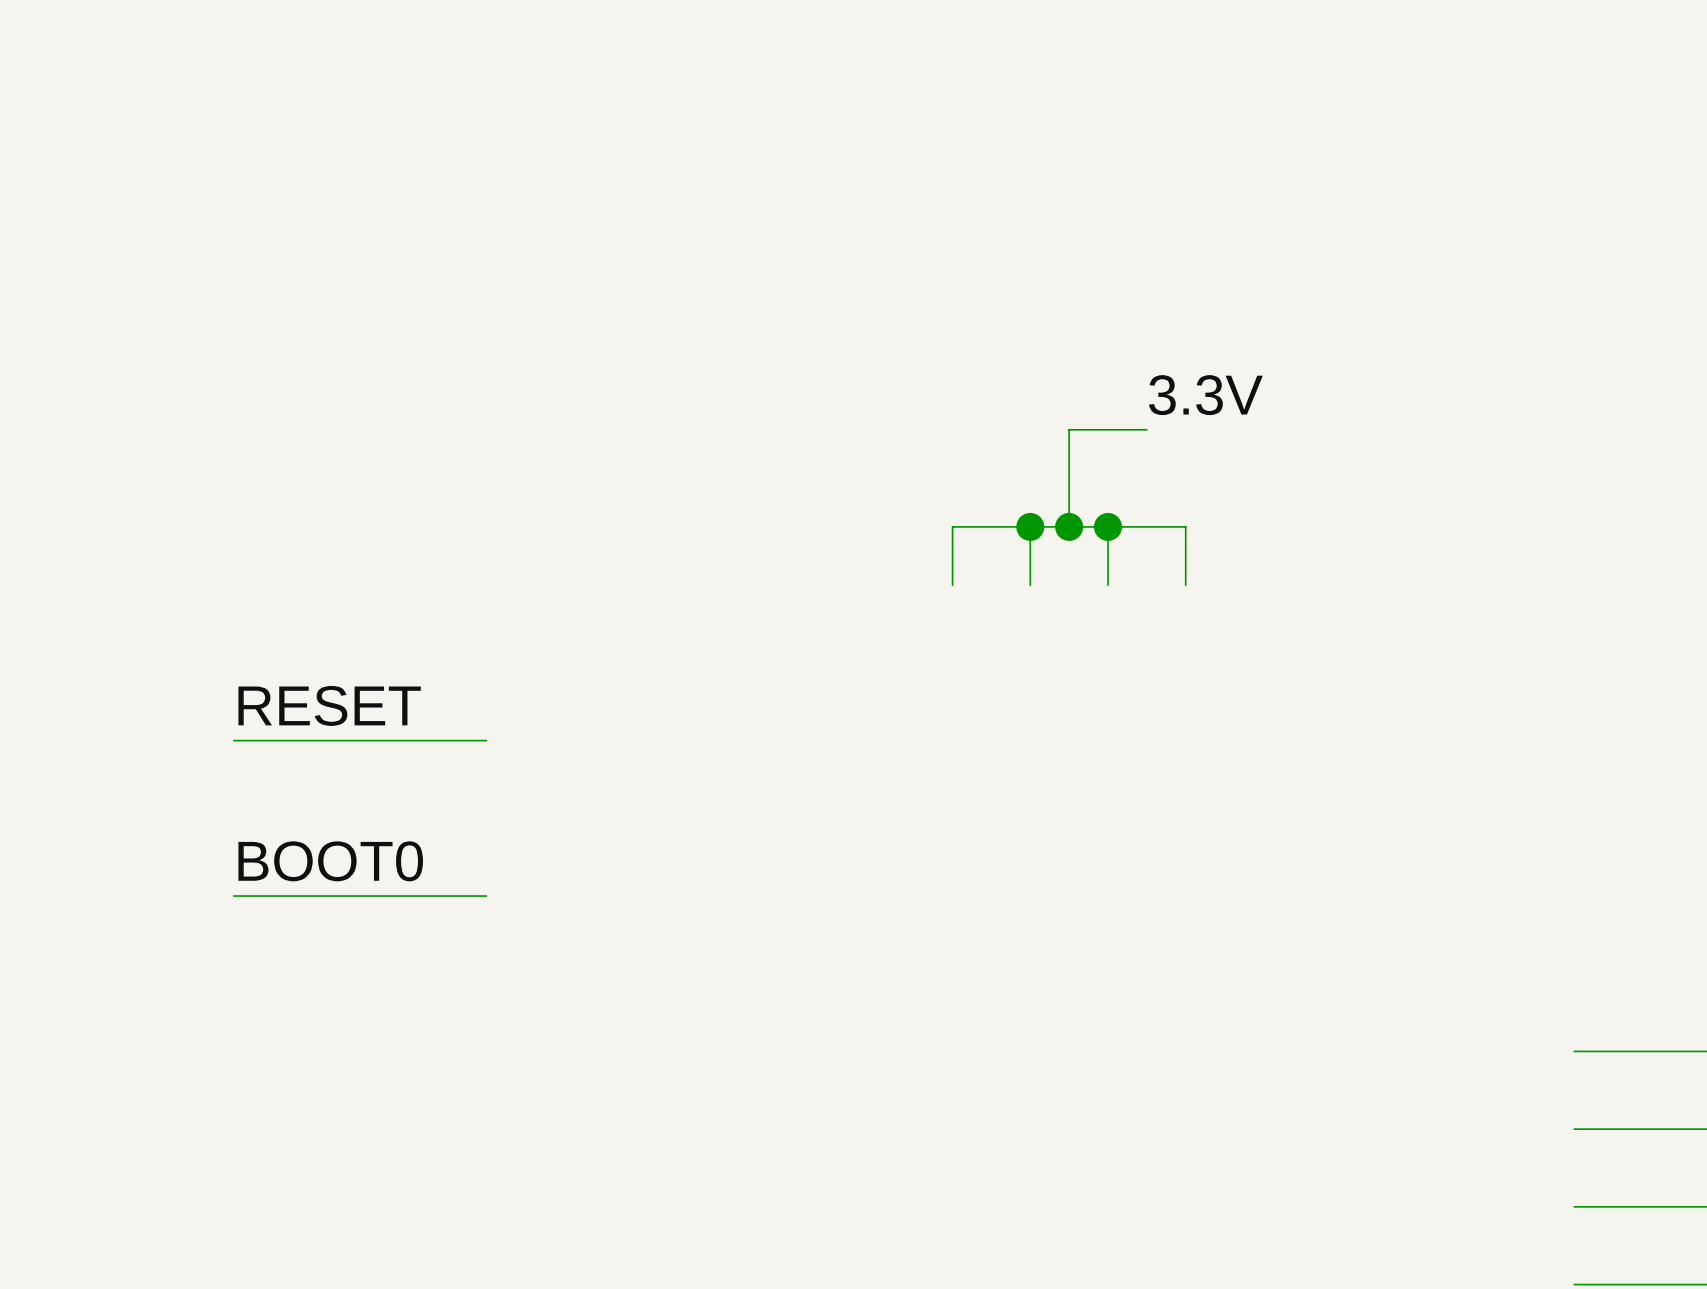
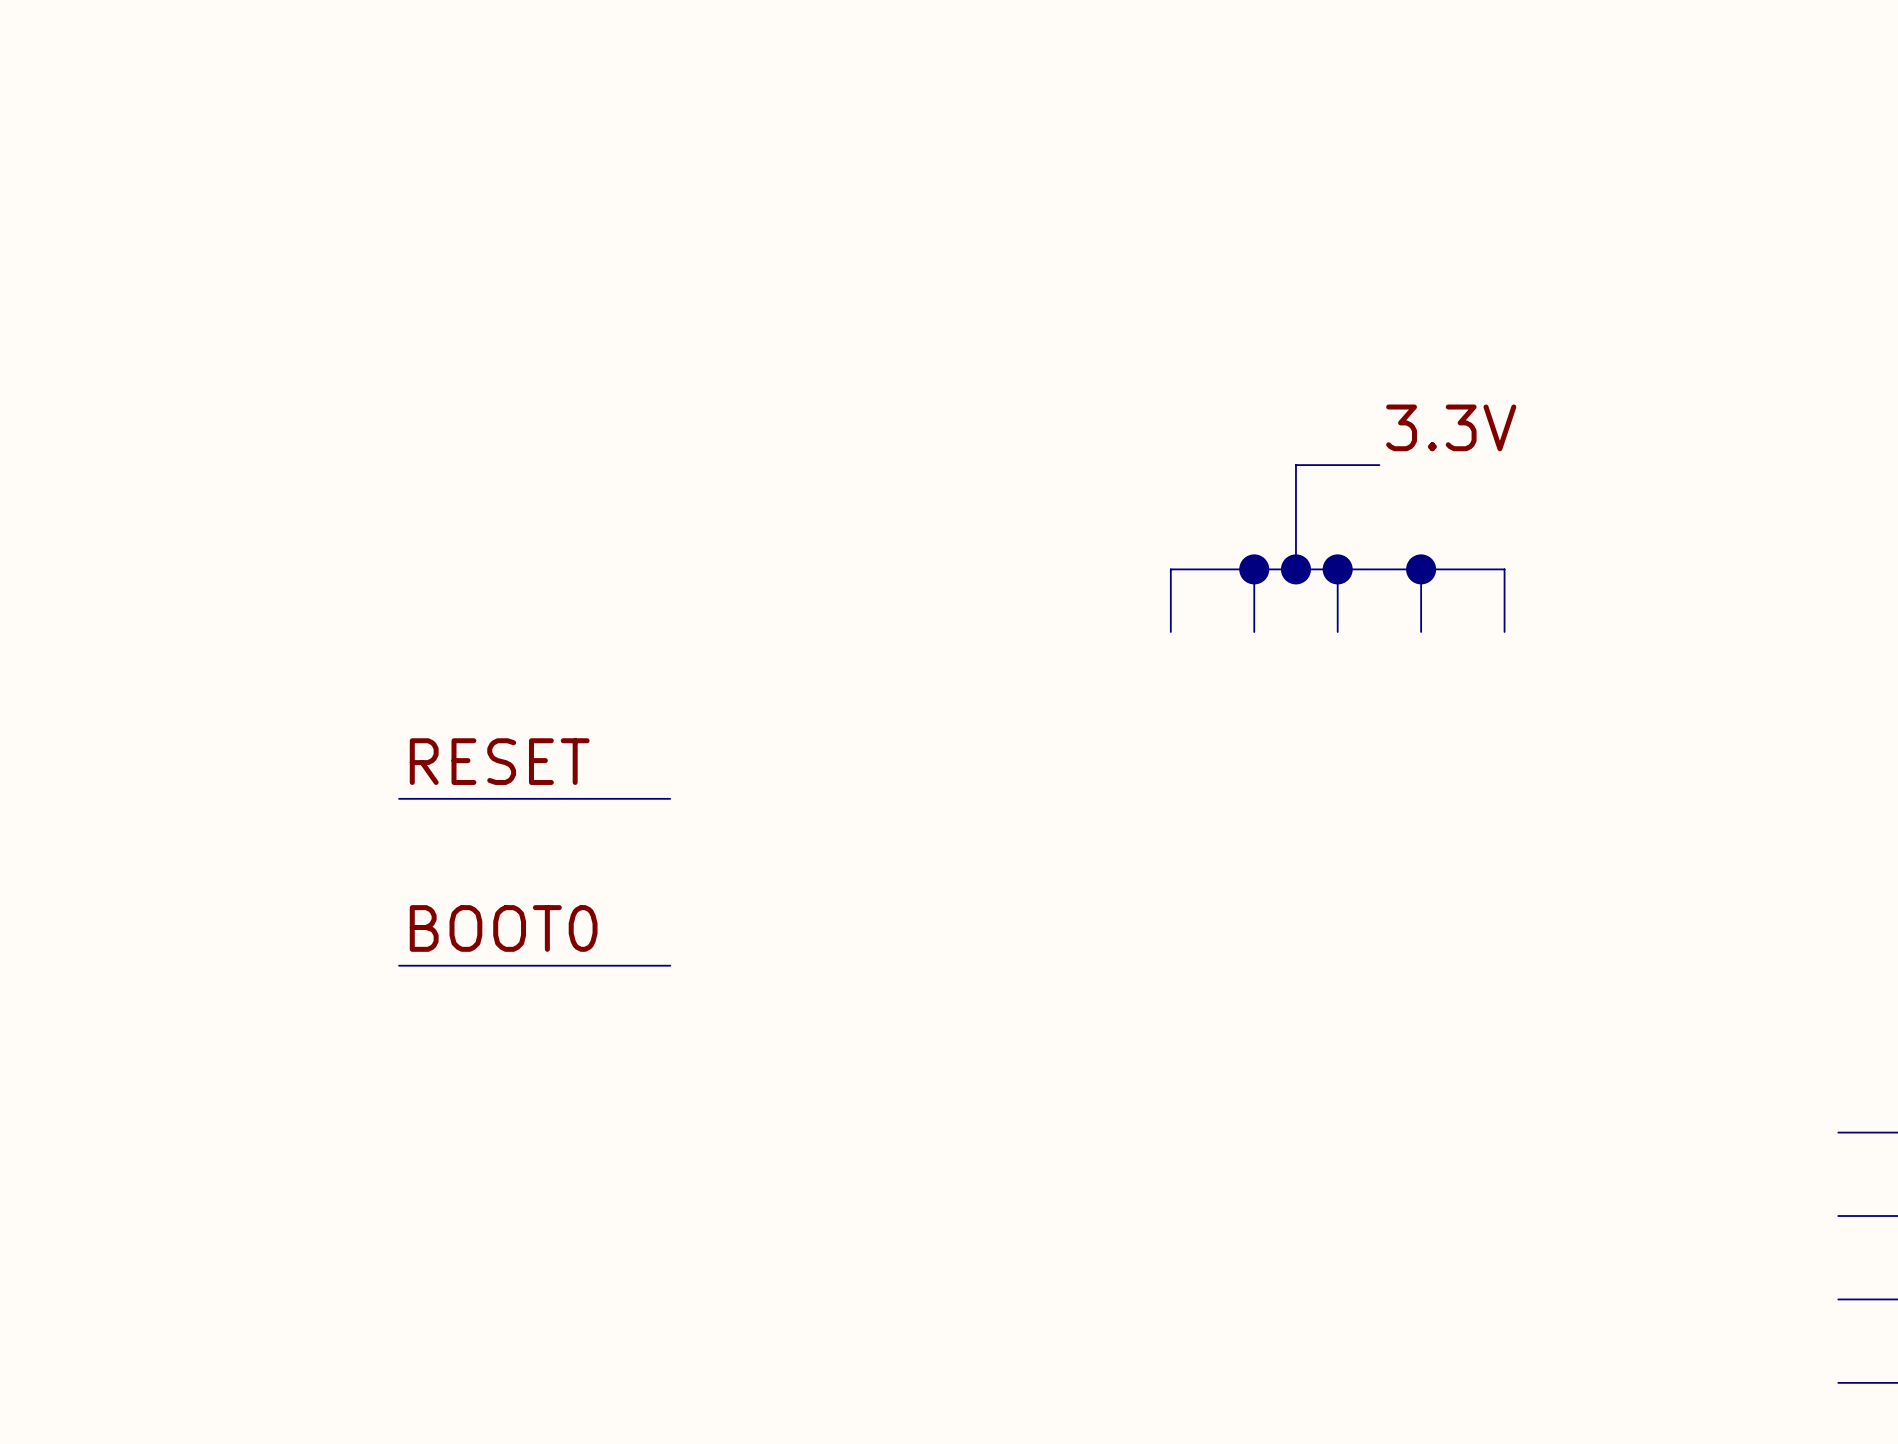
wire: none -> (1421, 569) (1504, 569) (1504, 631)
junction: none -> (1421, 569)

